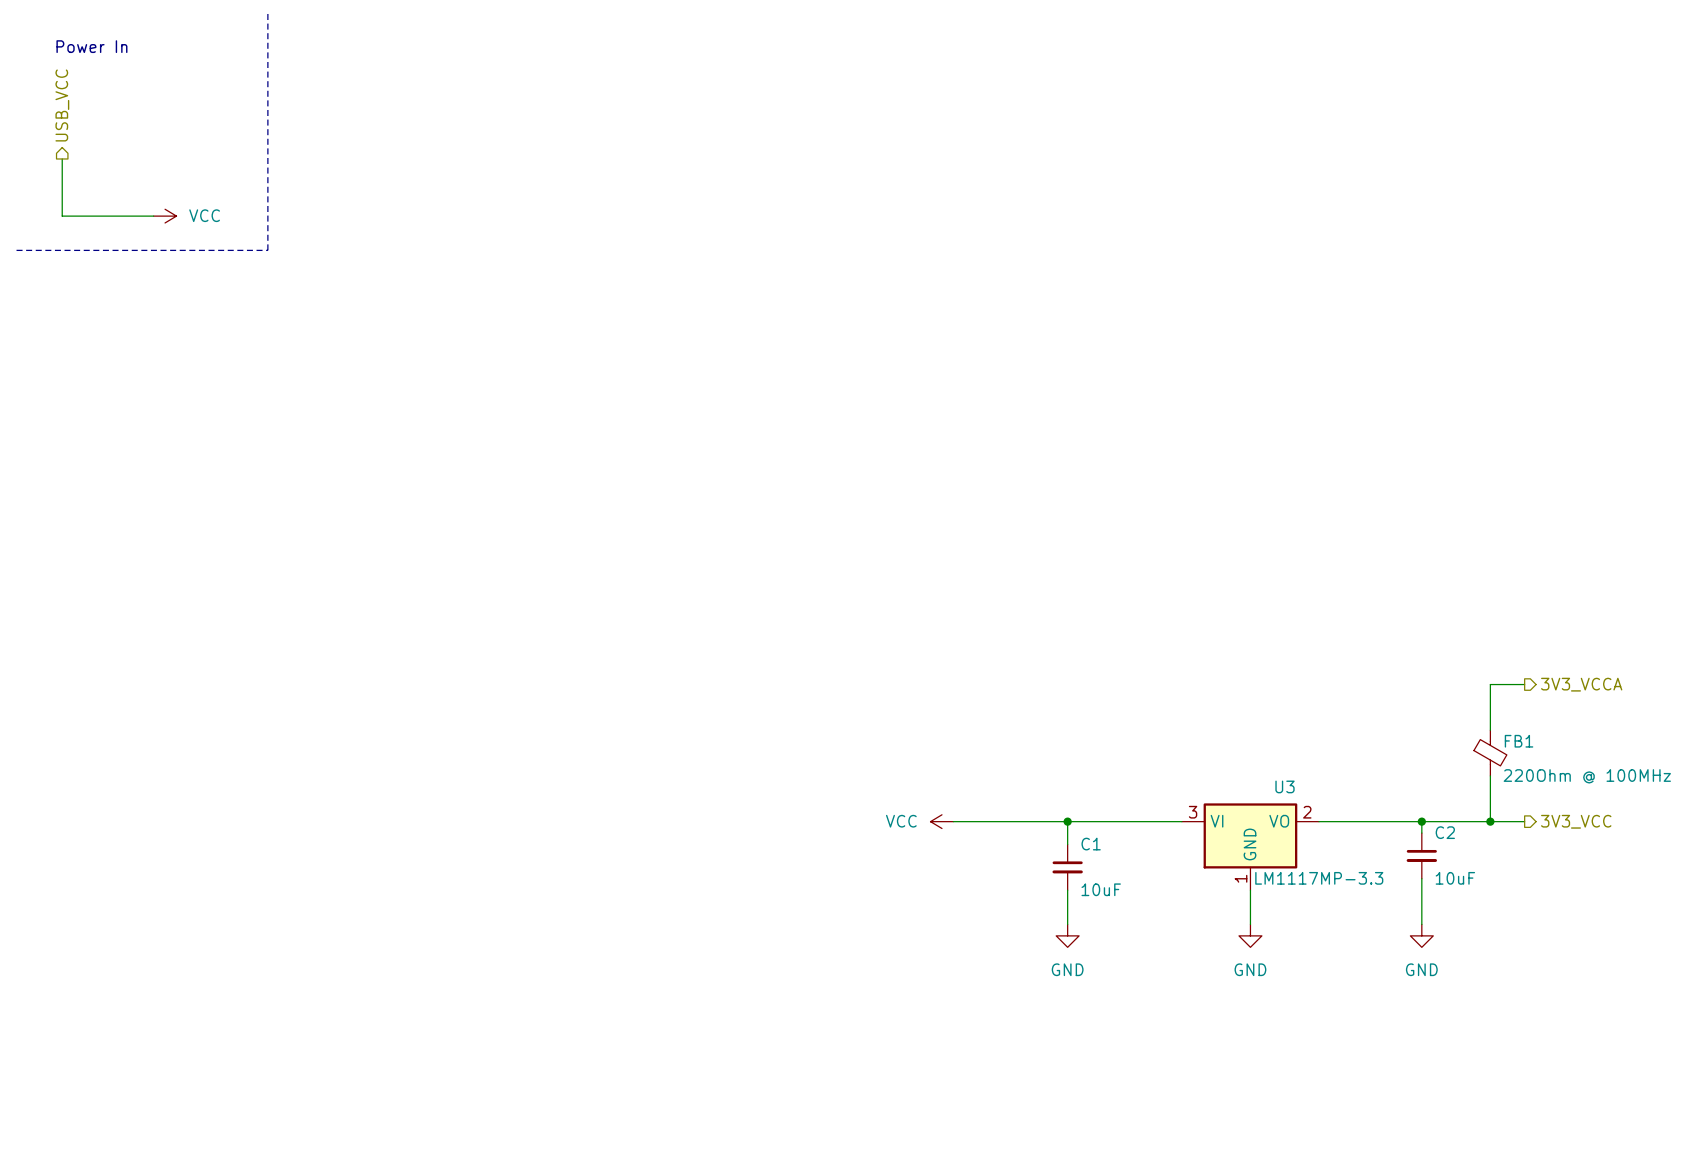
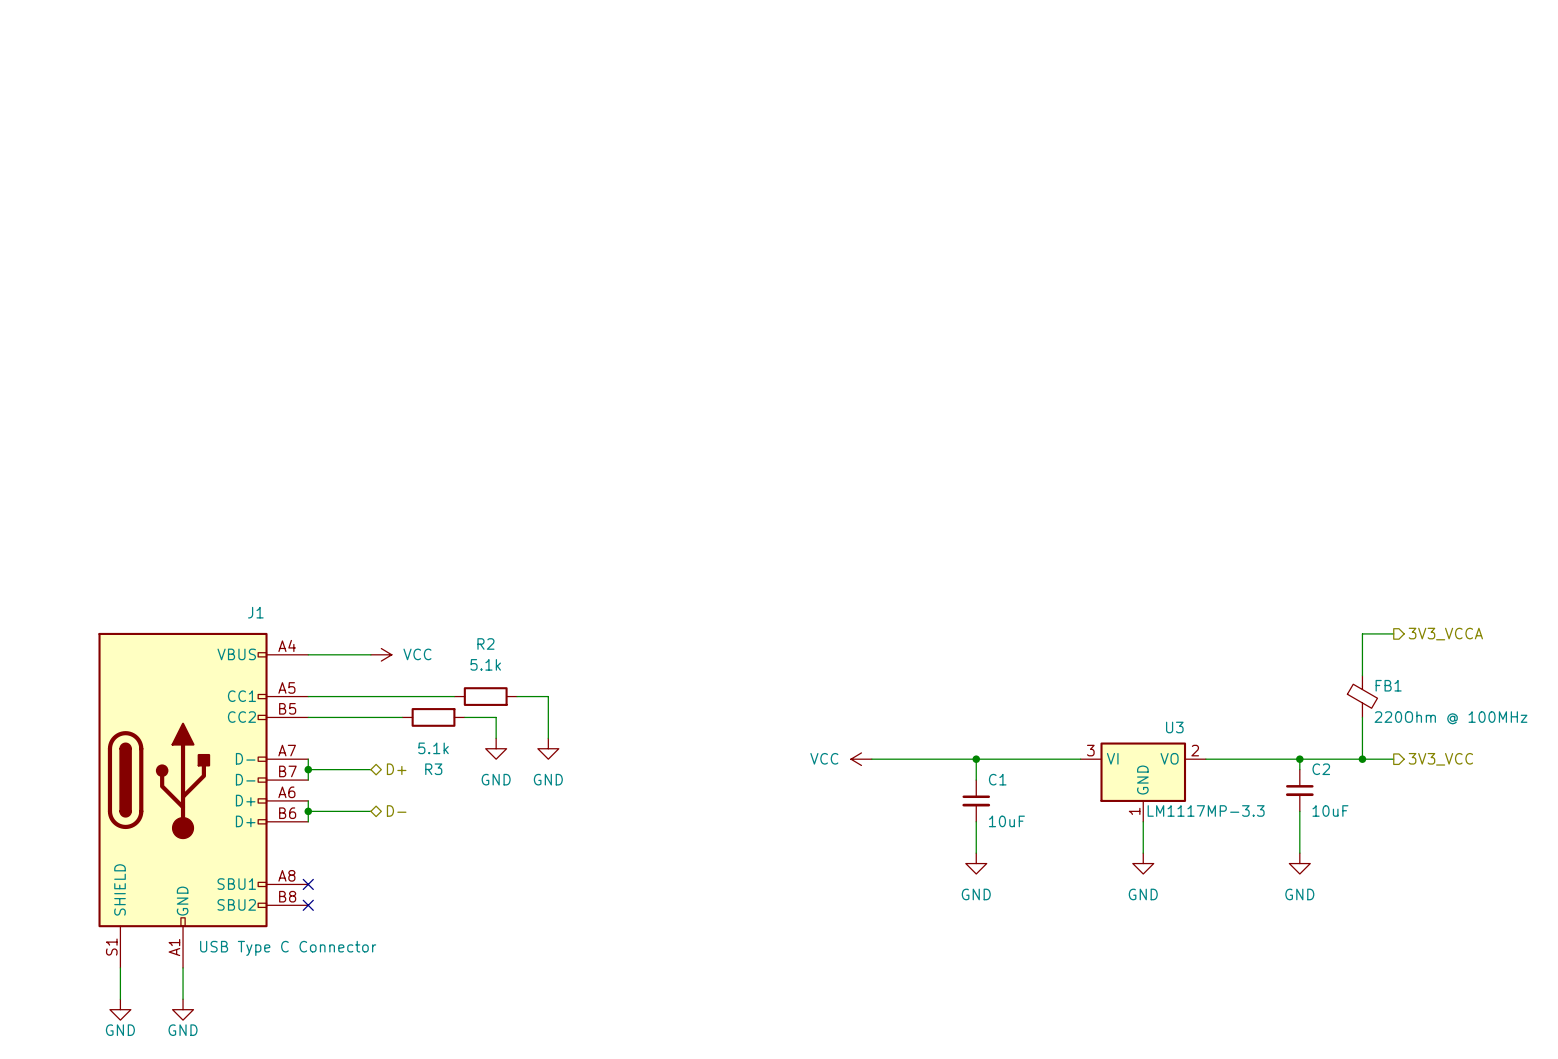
line: (267, 10) (267, 250) (16, 250) -> none
text: Power In (91, 46) -> none
hierarchical label: USB_VCC (62, 105) -> none
wire: (62, 158) (62, 216) (153, 216) -> none
power symbol: VCC (165, 216) -> none
wire: none -> (308, 654) (370, 654)
power symbol: none -> VCC (381, 654)
wire: none -> (308, 696) (454, 696)
R2: none -> 5.1k (485, 696)
wire: none -> (517, 696) (548, 696) (548, 738)
wire: none -> (308, 717) (402, 717)
R3: none -> 5.1k (433, 717)
wire: none -> (464, 717) (496, 717) (496, 738)
power symbol: none -> GND (496, 748)
power symbol: none -> GND (548, 748)
wire: none -> (308, 759) (308, 780)
hierarchical label: none -> D+ (396, 769)
wire: none -> (308, 769) (370, 769)
junction: none -> (308, 769)
J1: none -> USB Type C Connector (203, 800)
wire: none -> (308, 800) (308, 821)
wire: none -> (308, 811) (370, 811)
junction: none -> (308, 811)
hierarchical label: none -> D- (396, 810)
no-connect mark: none -> (308, 884)
no-connect mark: none -> (308, 905)
wire: none -> (120, 967) (120, 999)
wire: none -> (183, 967) (183, 999)
power symbol: none -> GND (120, 1009)
power symbol: none -> GND (183, 1009)

